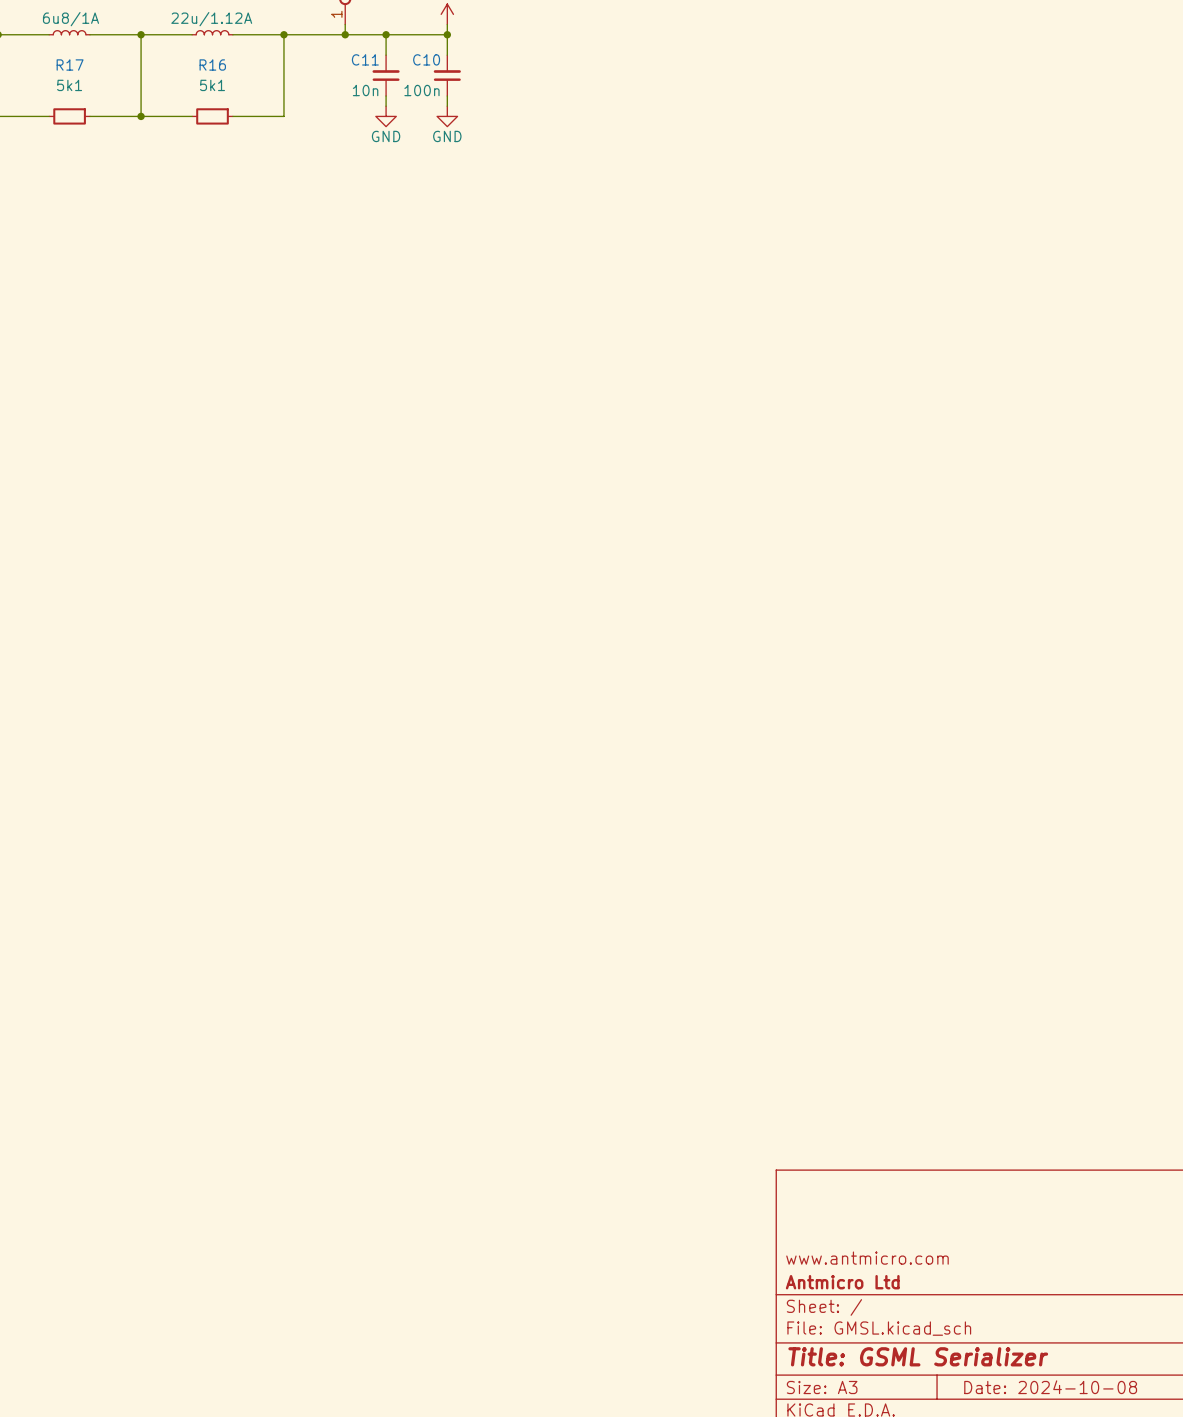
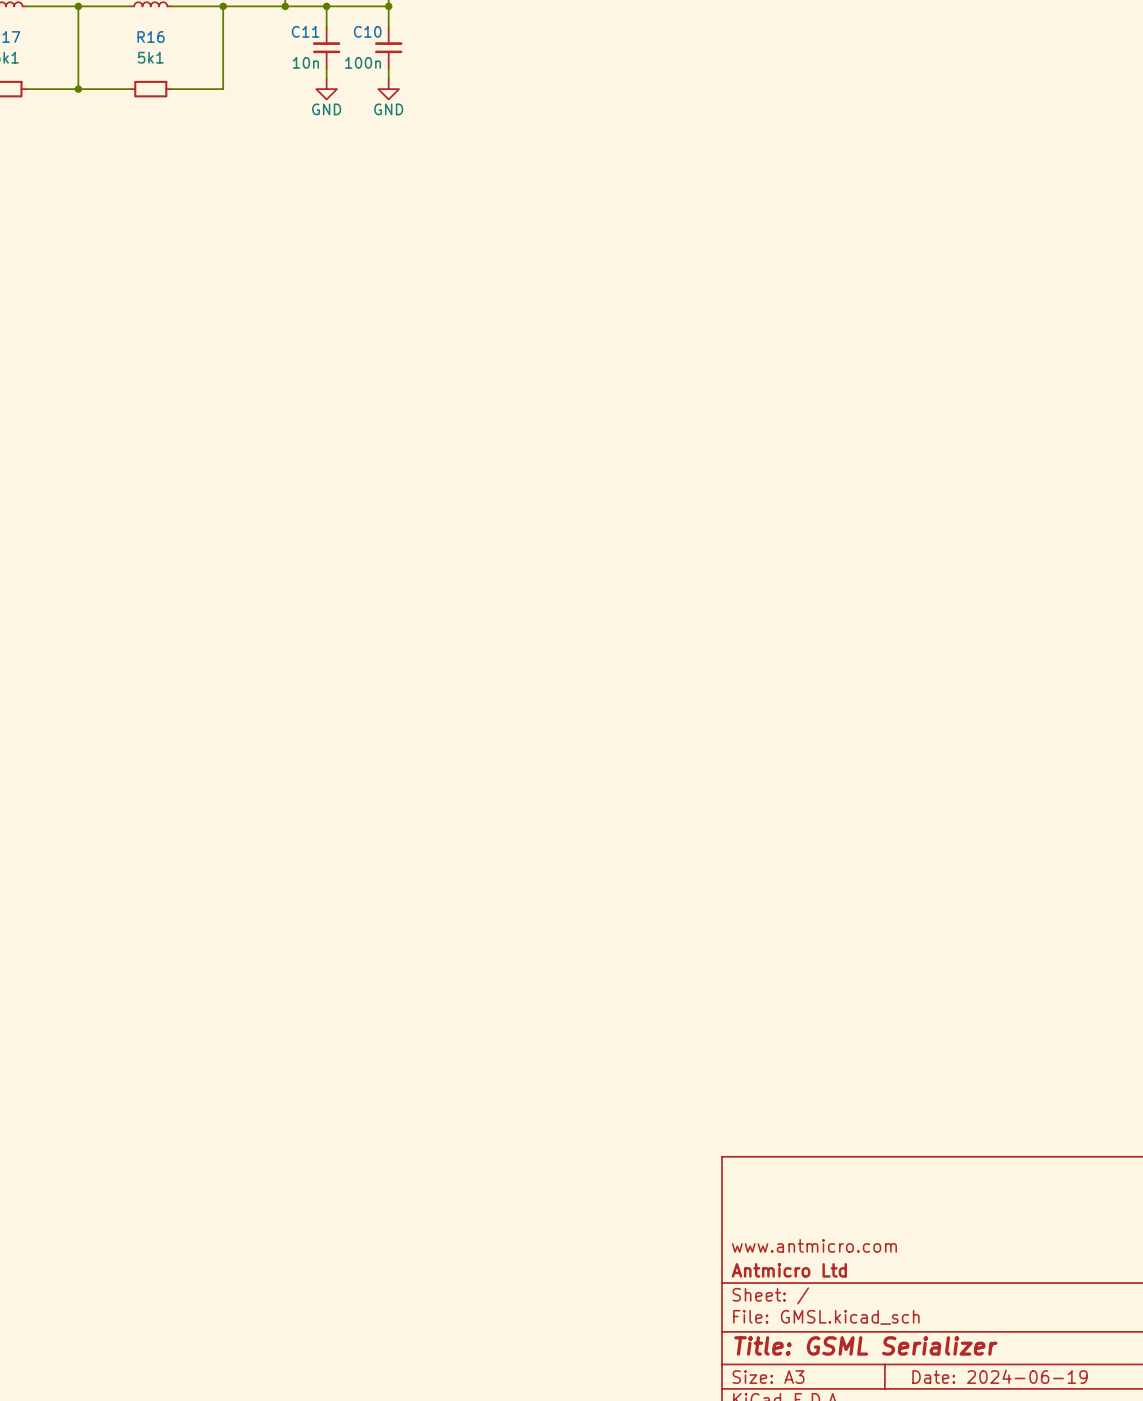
title block: Date: 2024-10-08 (1050, 1387) -> Date: 2024-06-19 (1000, 1376)

